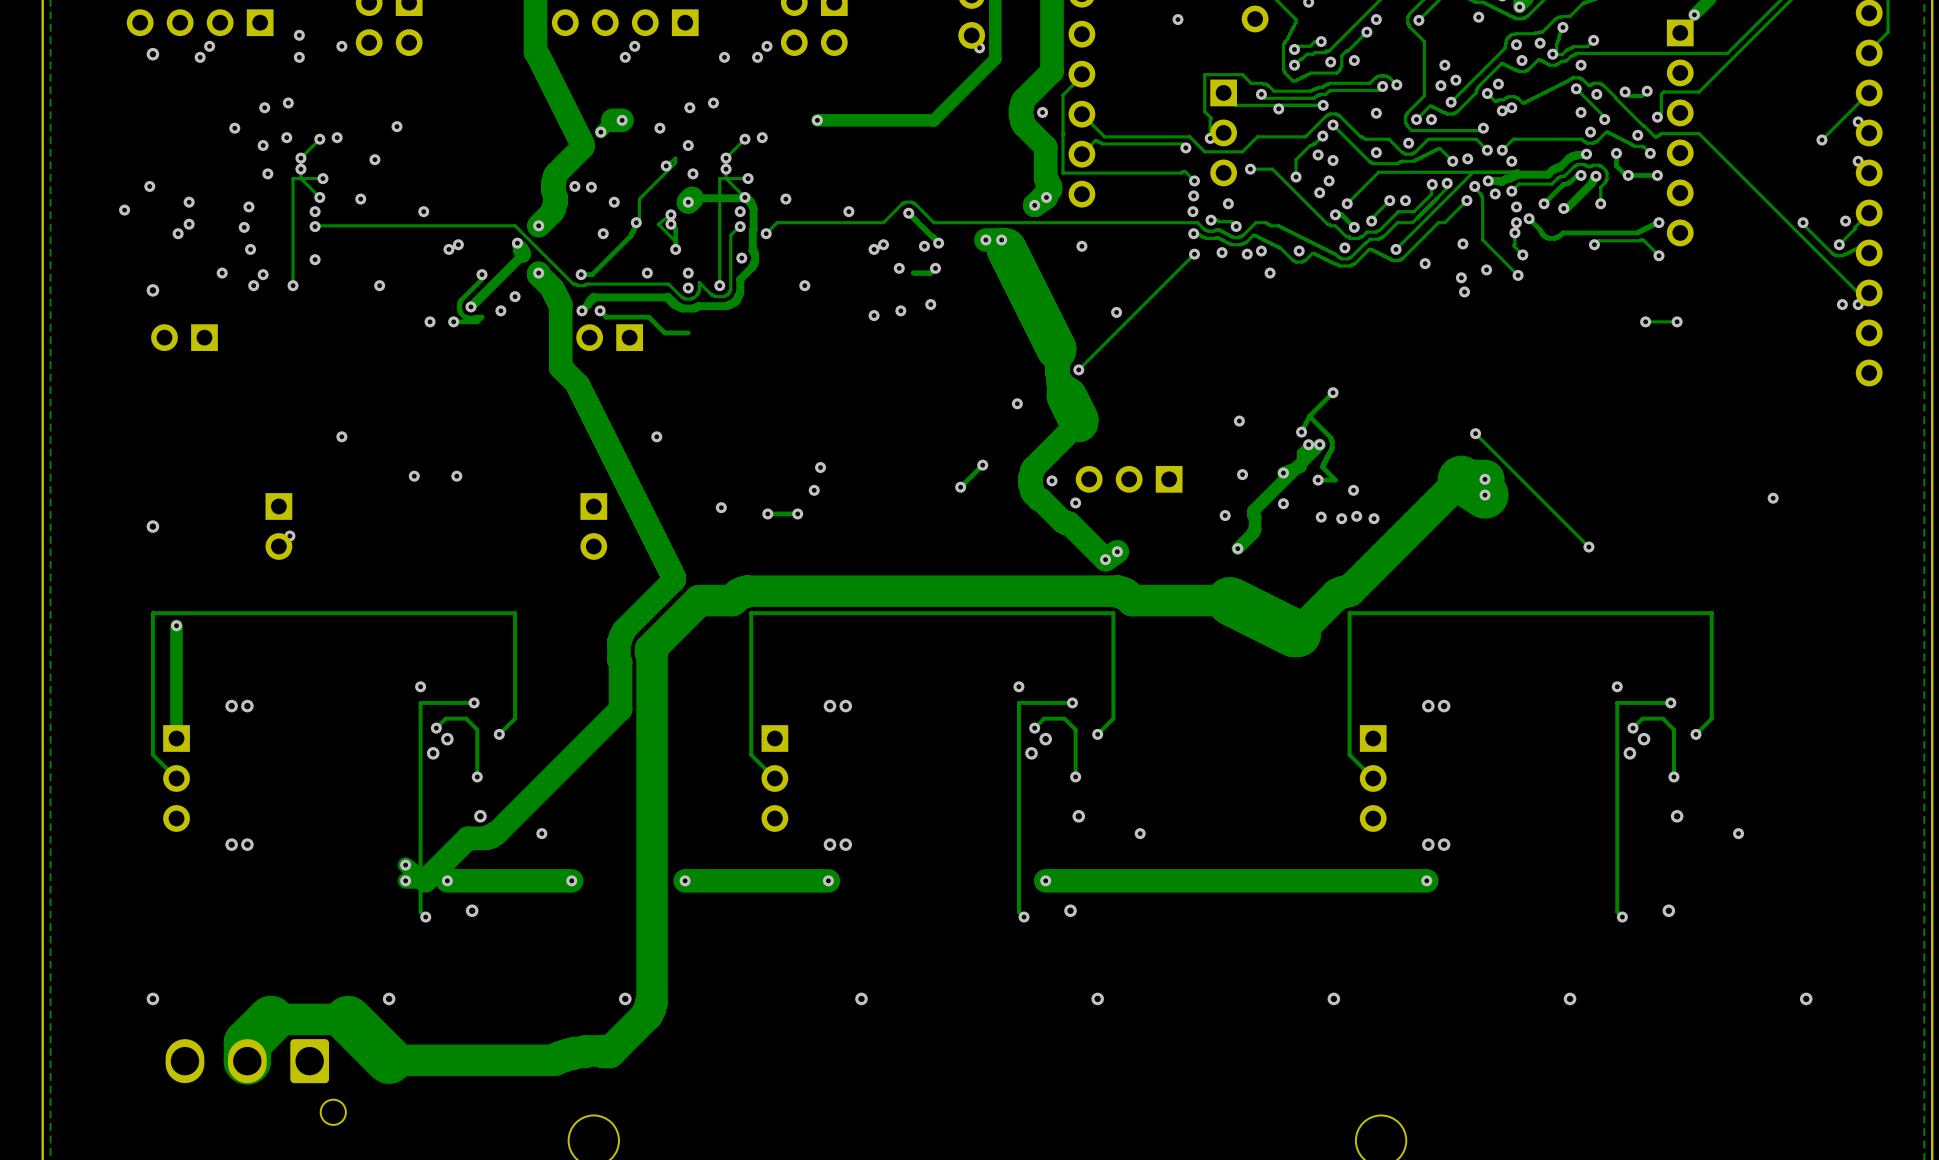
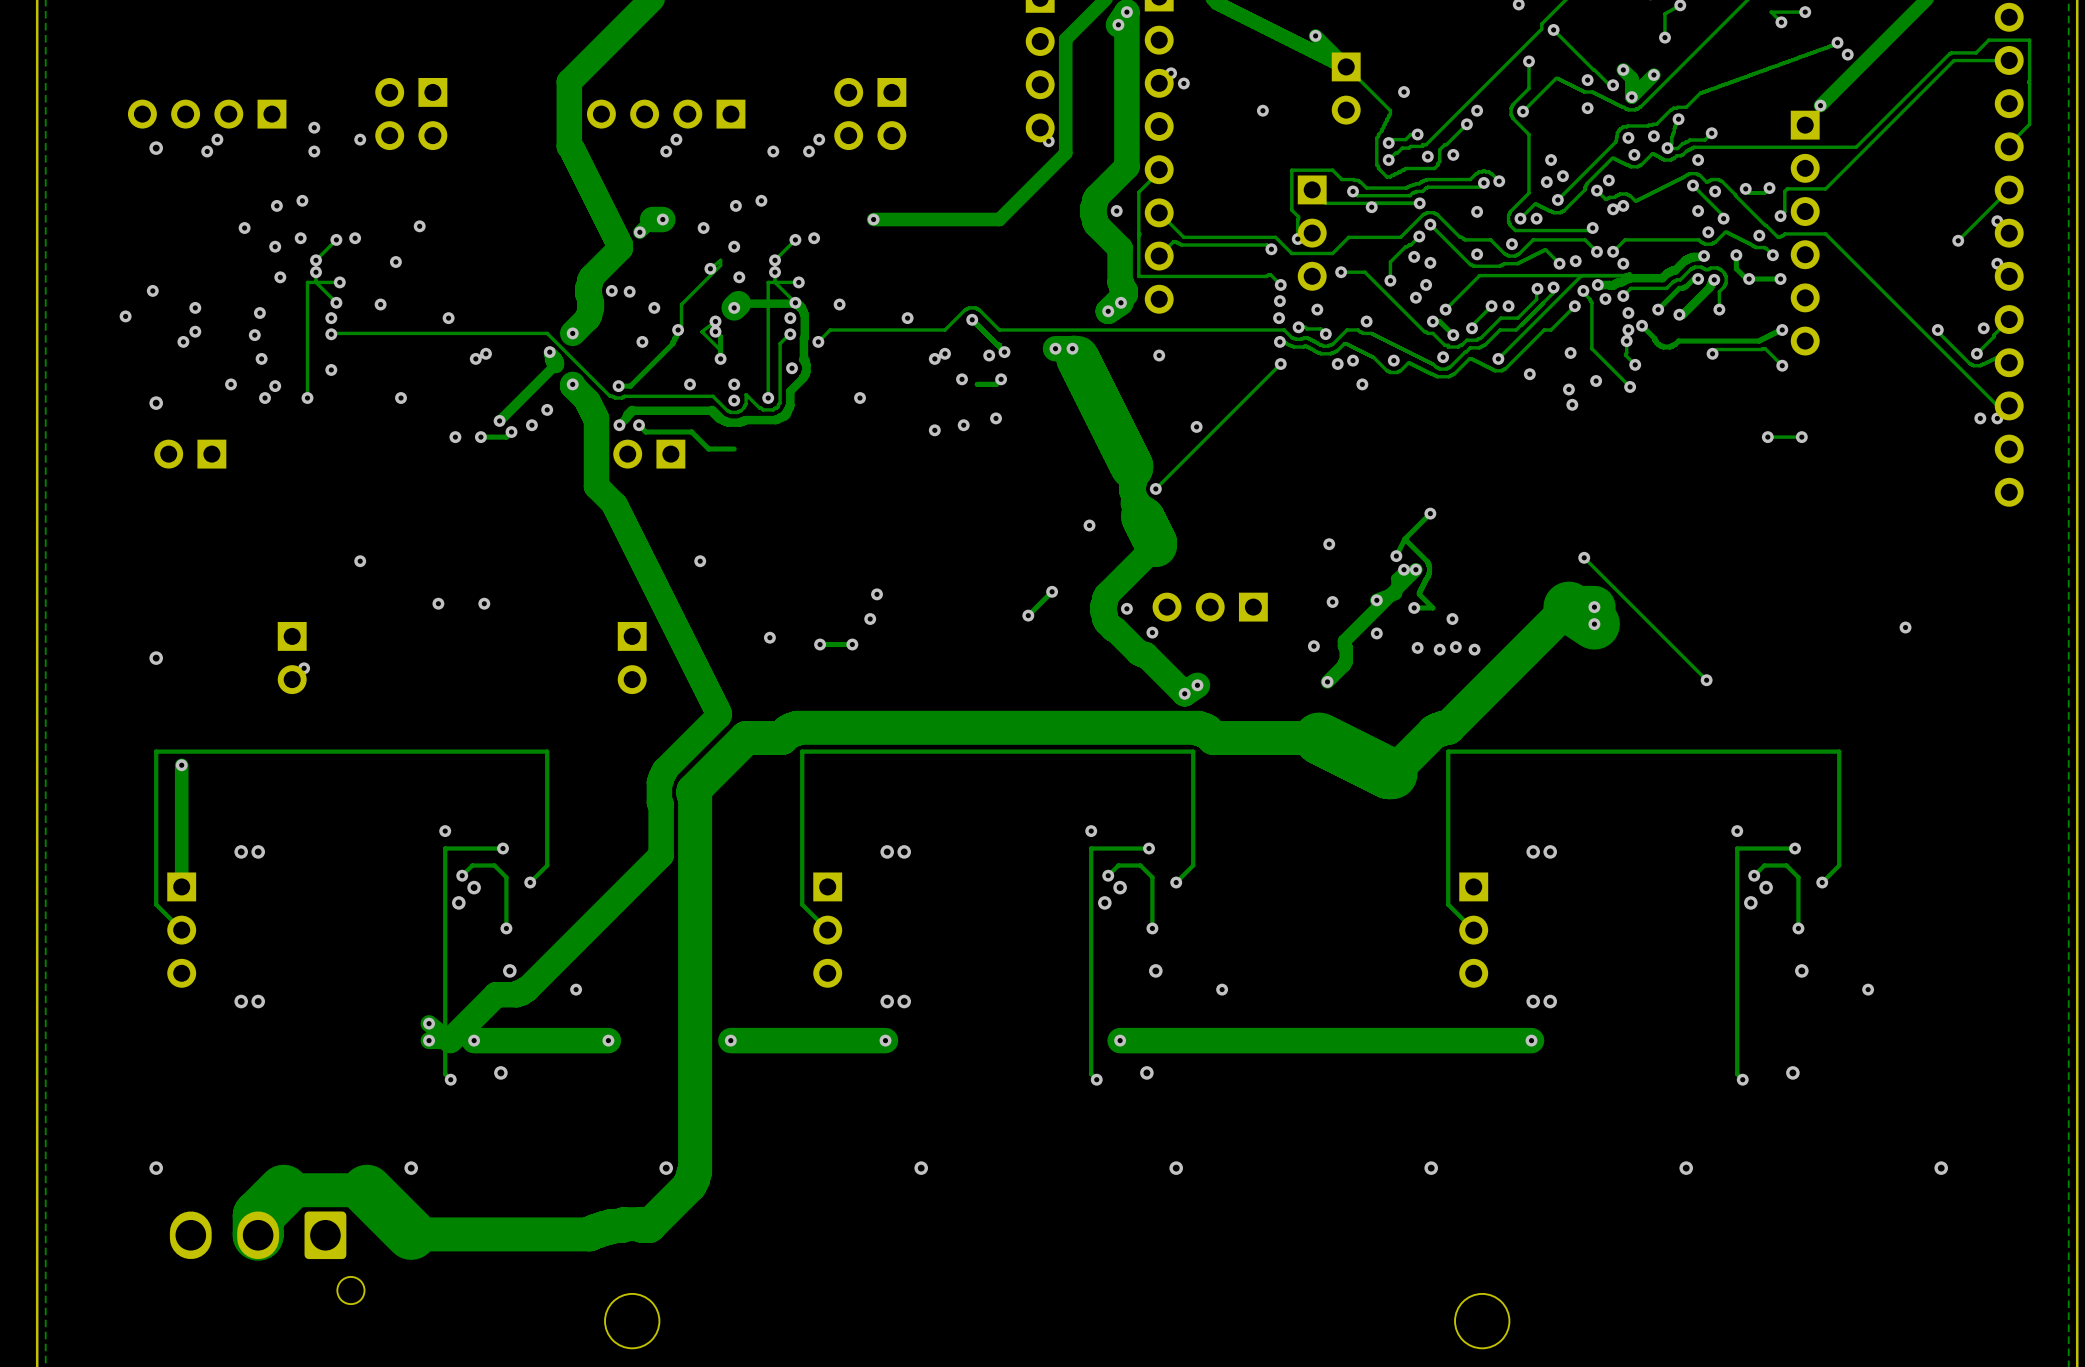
via position: (1222, 252) -> (1366, 321)
track: (482, 274) (482, 279) (460, 300) (459, 305) (459, 311) (464, 317) (469, 318) (482, 317) -> none
via position: (482, 274) -> (511, 432)

